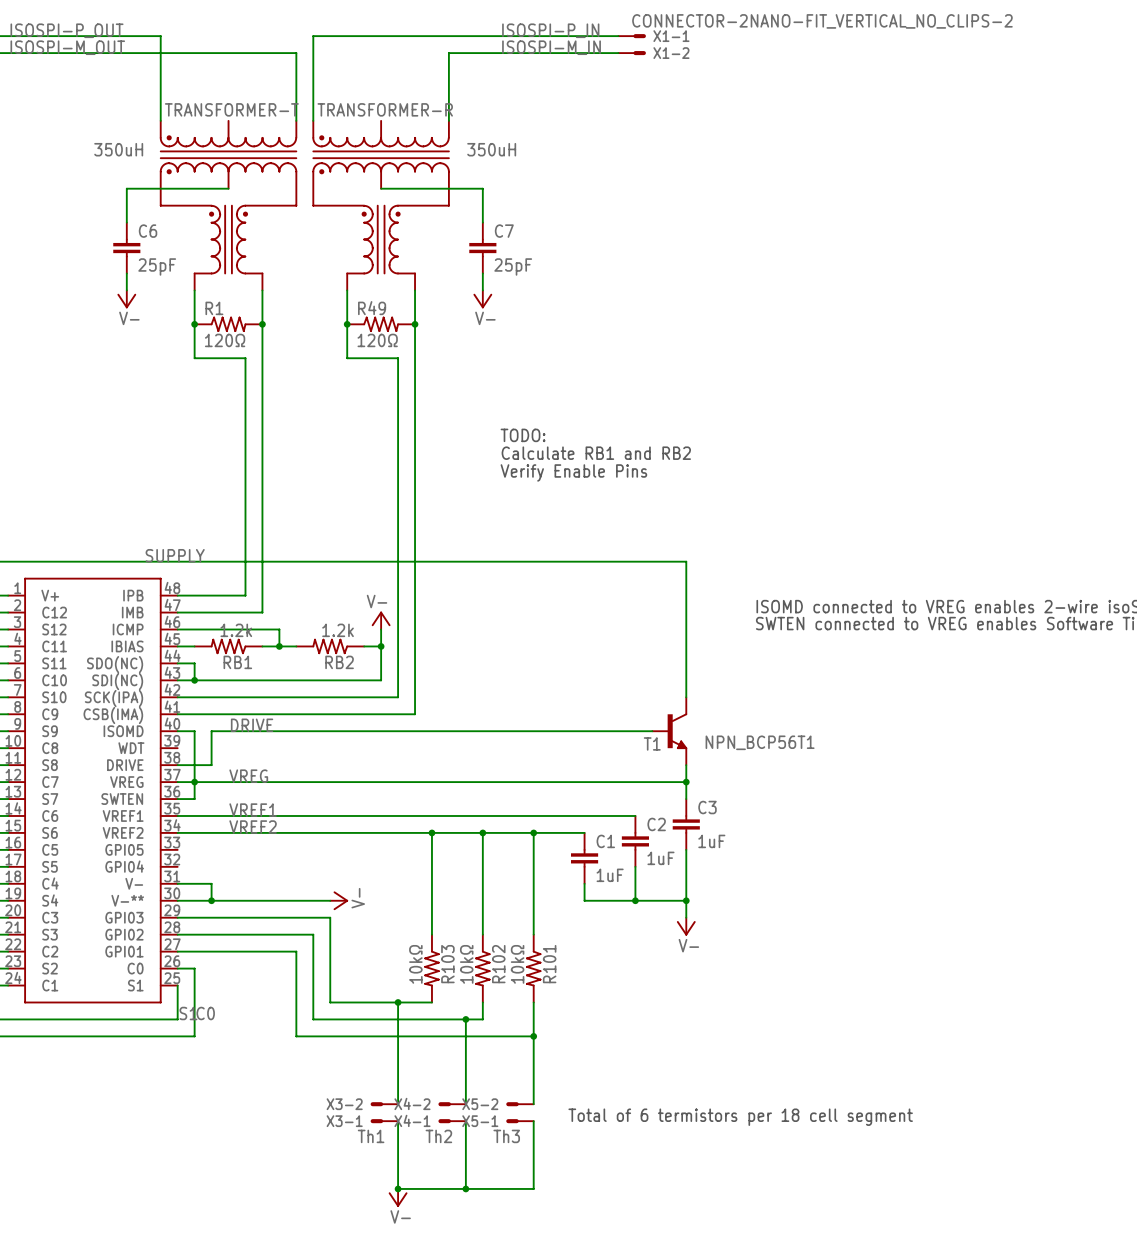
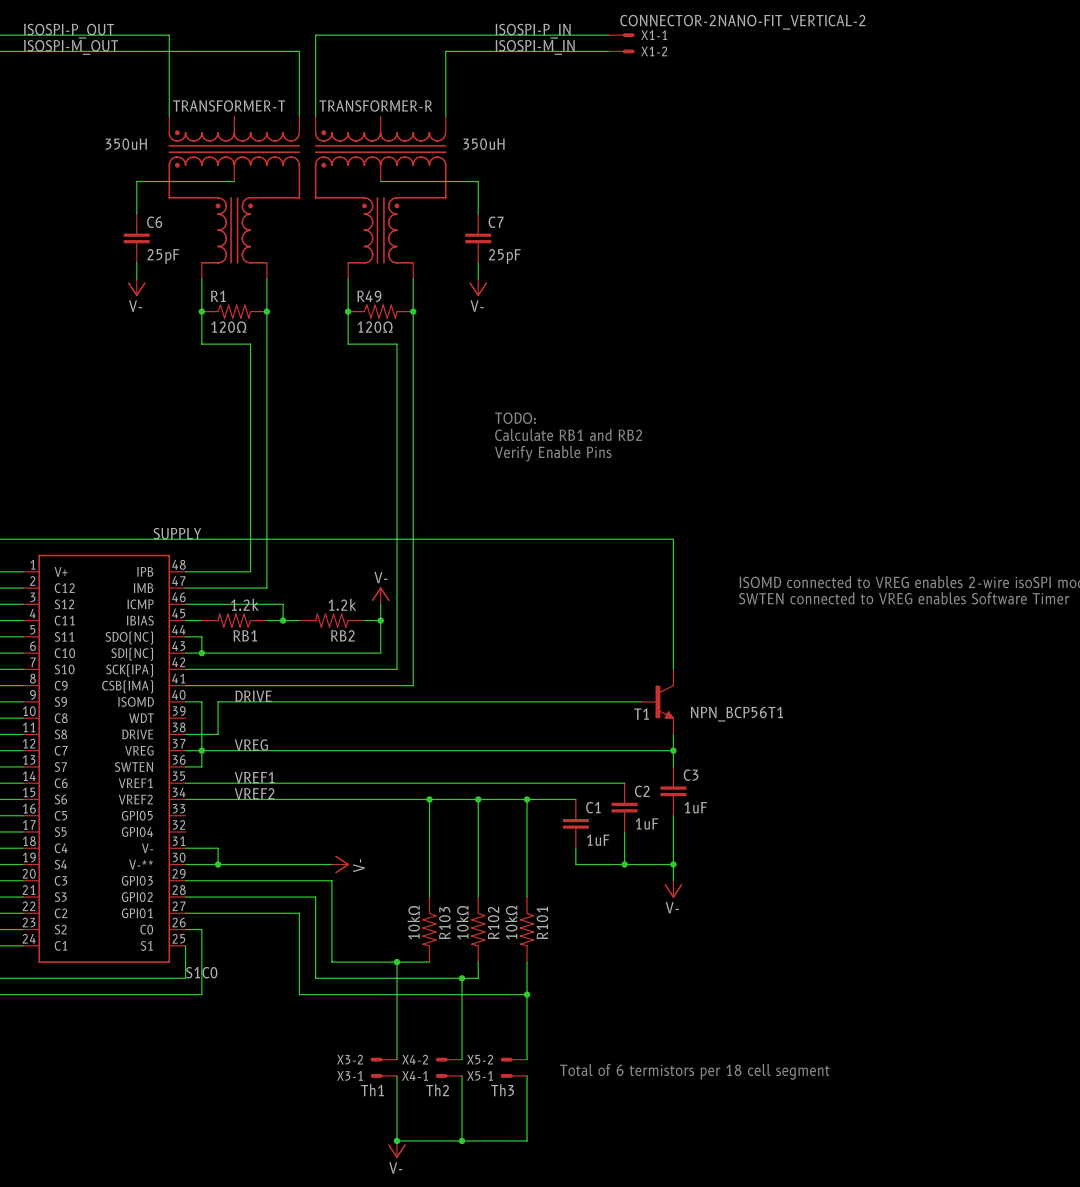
X1-1 value: CONNECTOR-2NANO-FIT_VERTICAL_NO_CLIPS-2 (822, 21) -> CONNECTOR-2NANO-FIT_VERTICAL-2 (742, 22)

